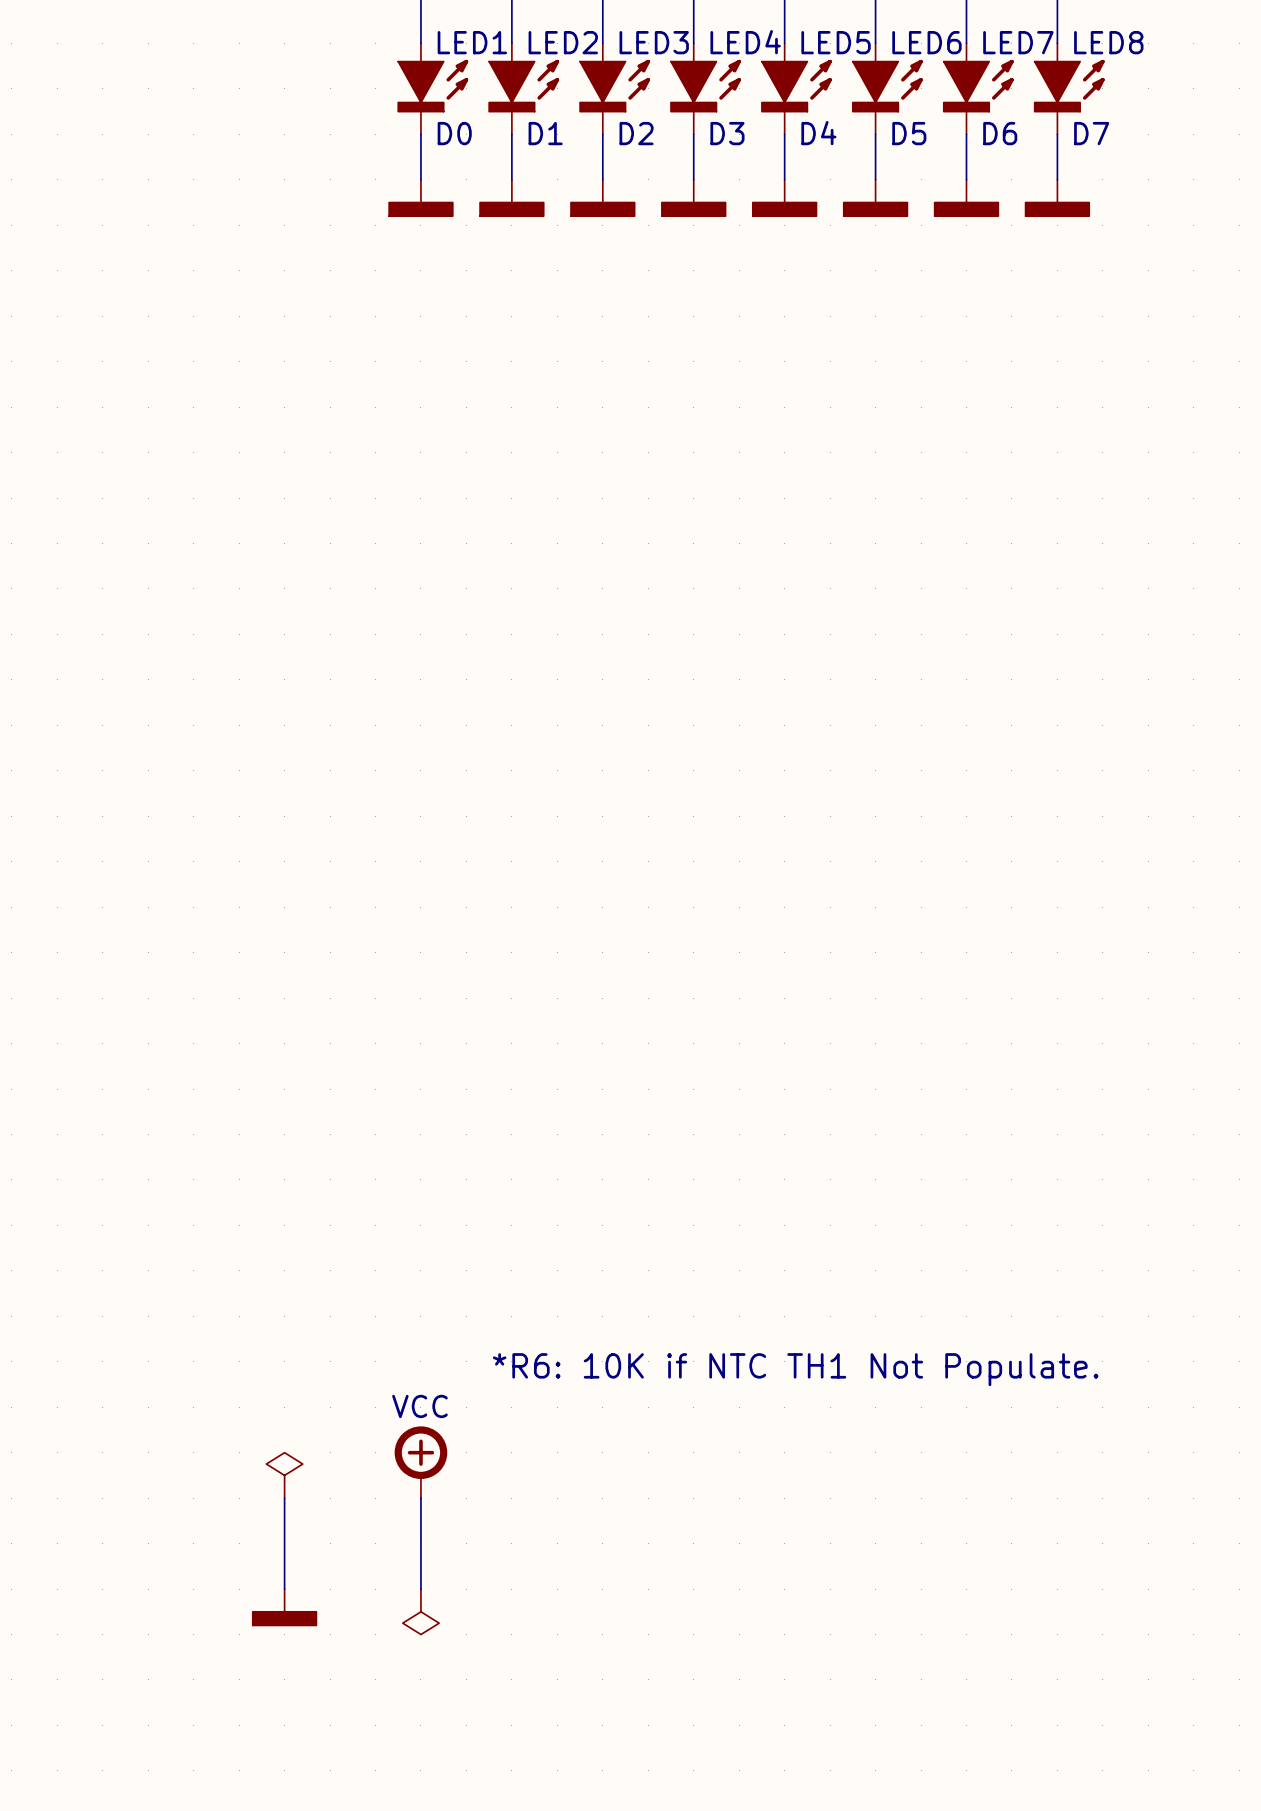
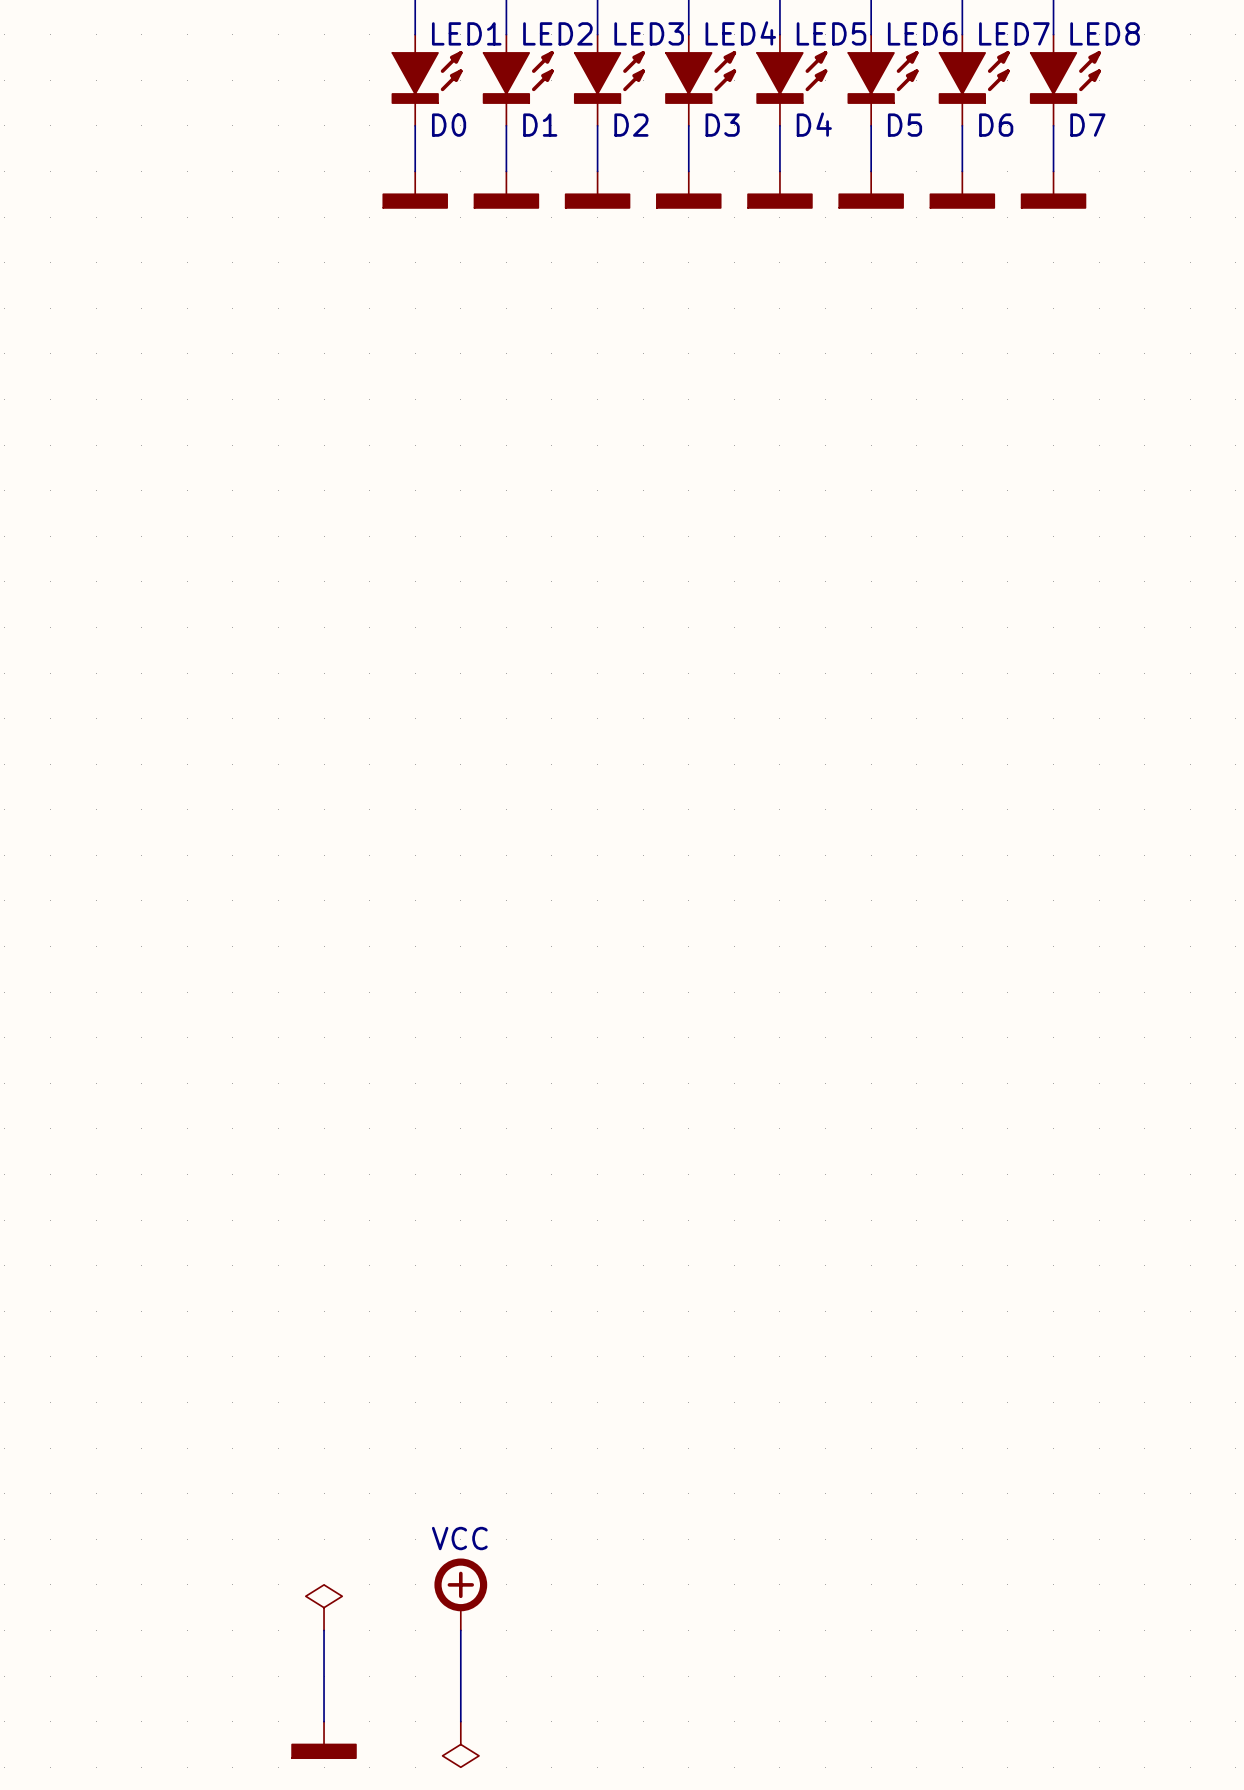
text: *R6: 10K if NTC TH1 Not Populate. (795, 1369) -> none
power symbol position: (420, 1462) -> (460, 1594)
power symbol: (284, 1475) -> none
wire: (284, 1498) (284, 1589) -> (324, 1630) (324, 1721)
wire: (420, 1498) (420, 1589) -> (460, 1630) (460, 1721)
power symbol position: (284, 1607) -> (324, 1739)
power symbol: none -> (324, 1607)
power symbol: (420, 1611) -> none
power symbol: none -> (460, 1744)

